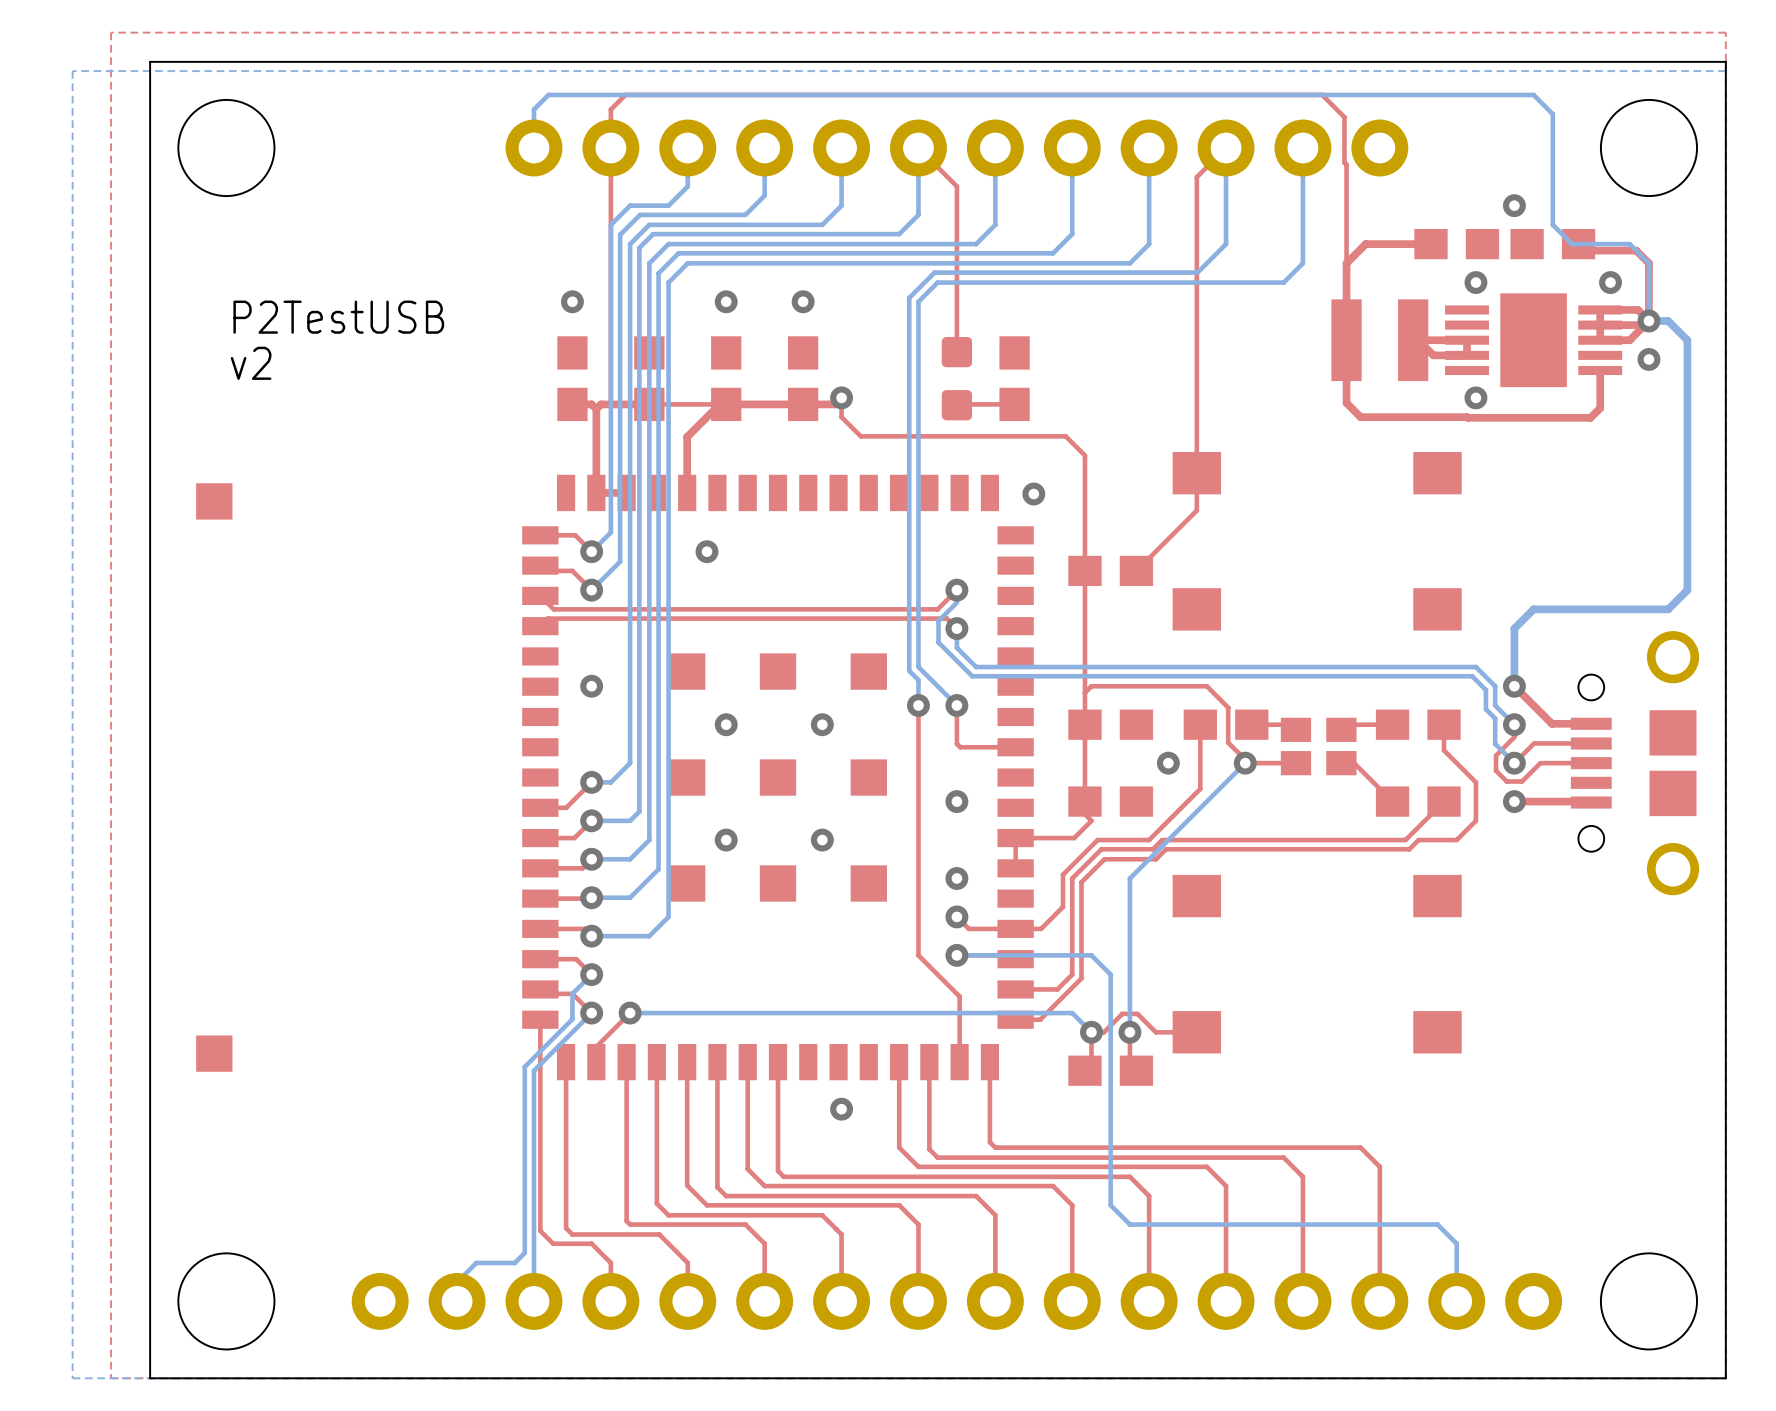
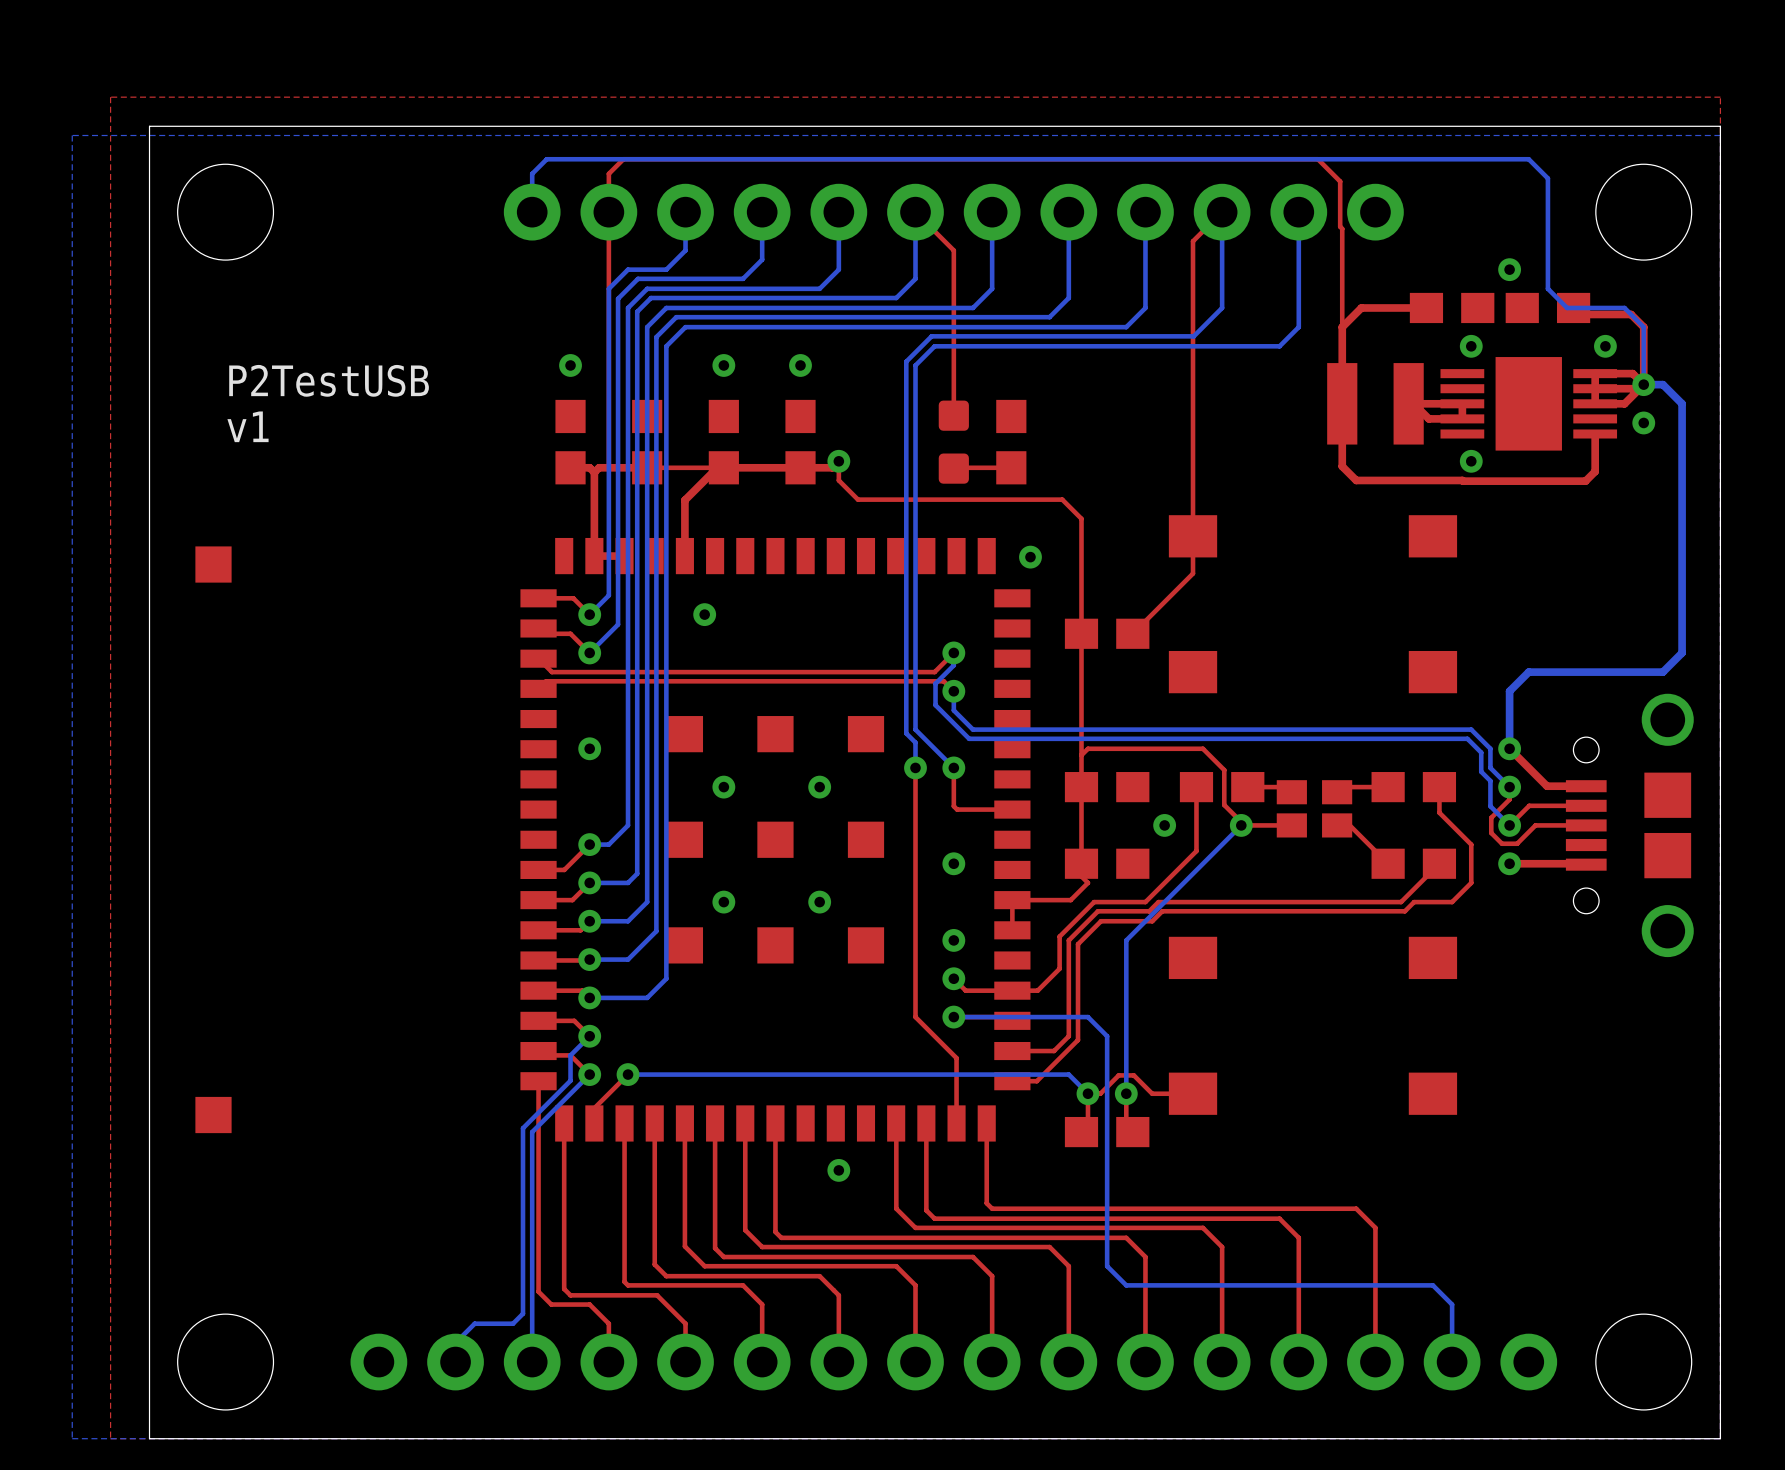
text: v2 (251, 363) -> v1 (248, 426)

